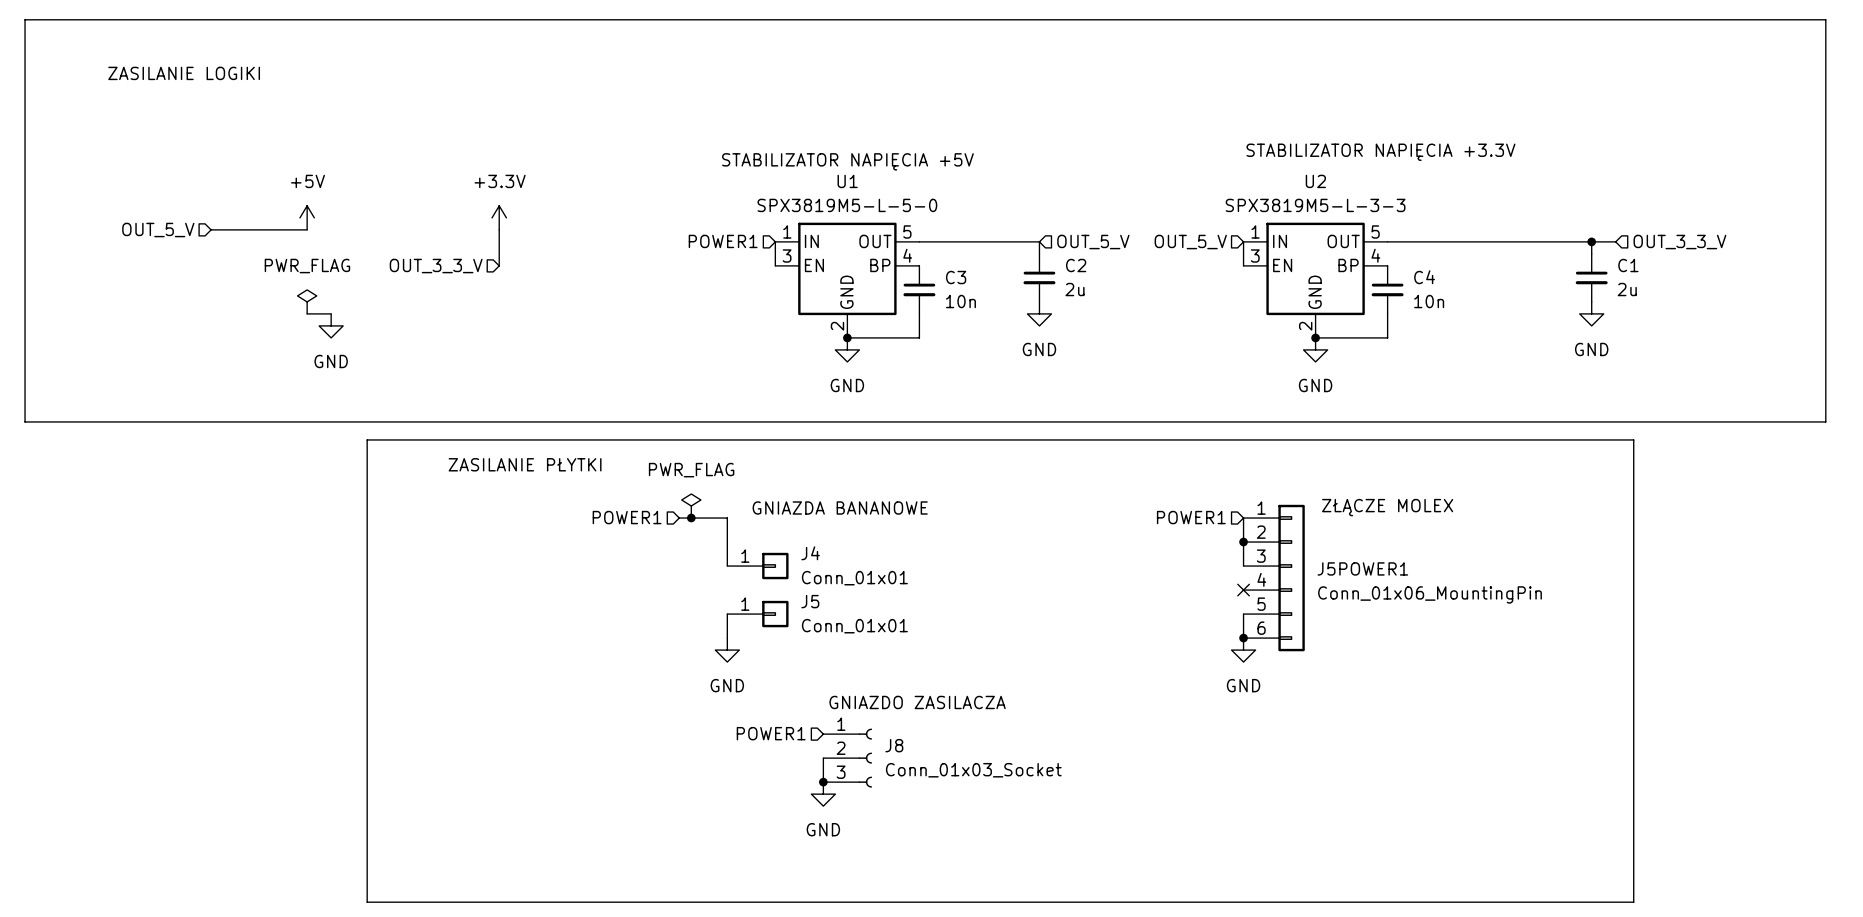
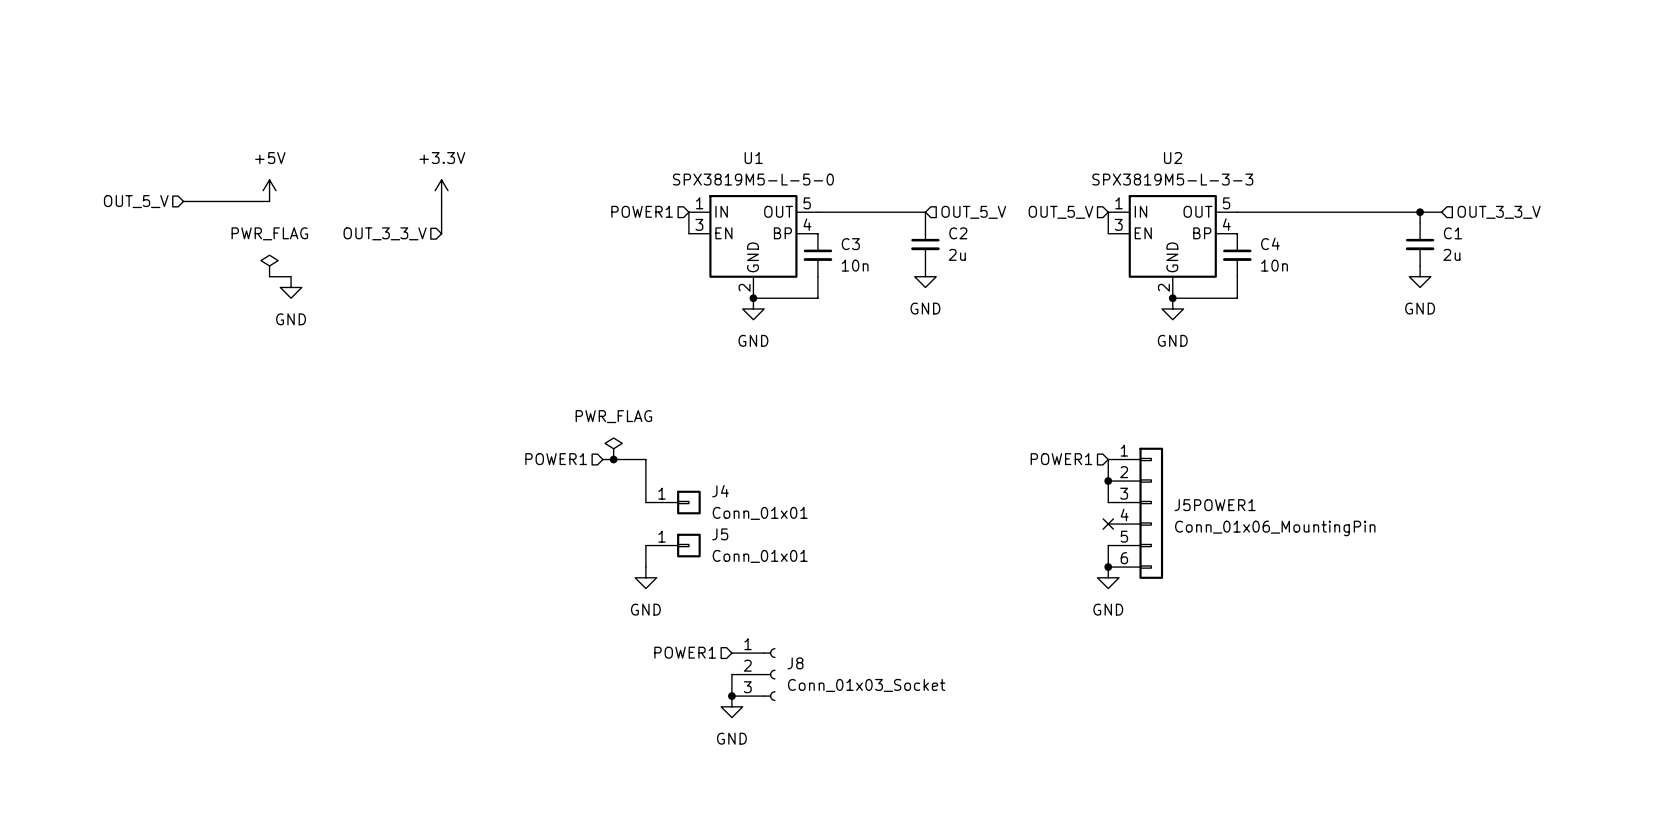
line: (25, 19) (1825, 19) (1825, 421) (25, 421) (25, 19) -> none
text: ZASILANIE LOGIKI (184, 73) -> none
text: STABILIZATOR NAPIĘCIA +3.3V (1380, 152) -> none
text: STABILIZATOR NAPIĘCIA +5V (847, 161) -> none
line: (367, 439) (1633, 439) (1633, 902) (367, 902) (367, 439) -> none
text: ZASILANIE PŁYTKI (525, 464) -> none
text: ZŁĄCZE MOLEX (1387, 507) -> none
text: GNIAZDA BANANOWE (840, 508) -> none
text: GNIAZDO ZASILACZA (917, 702) -> none

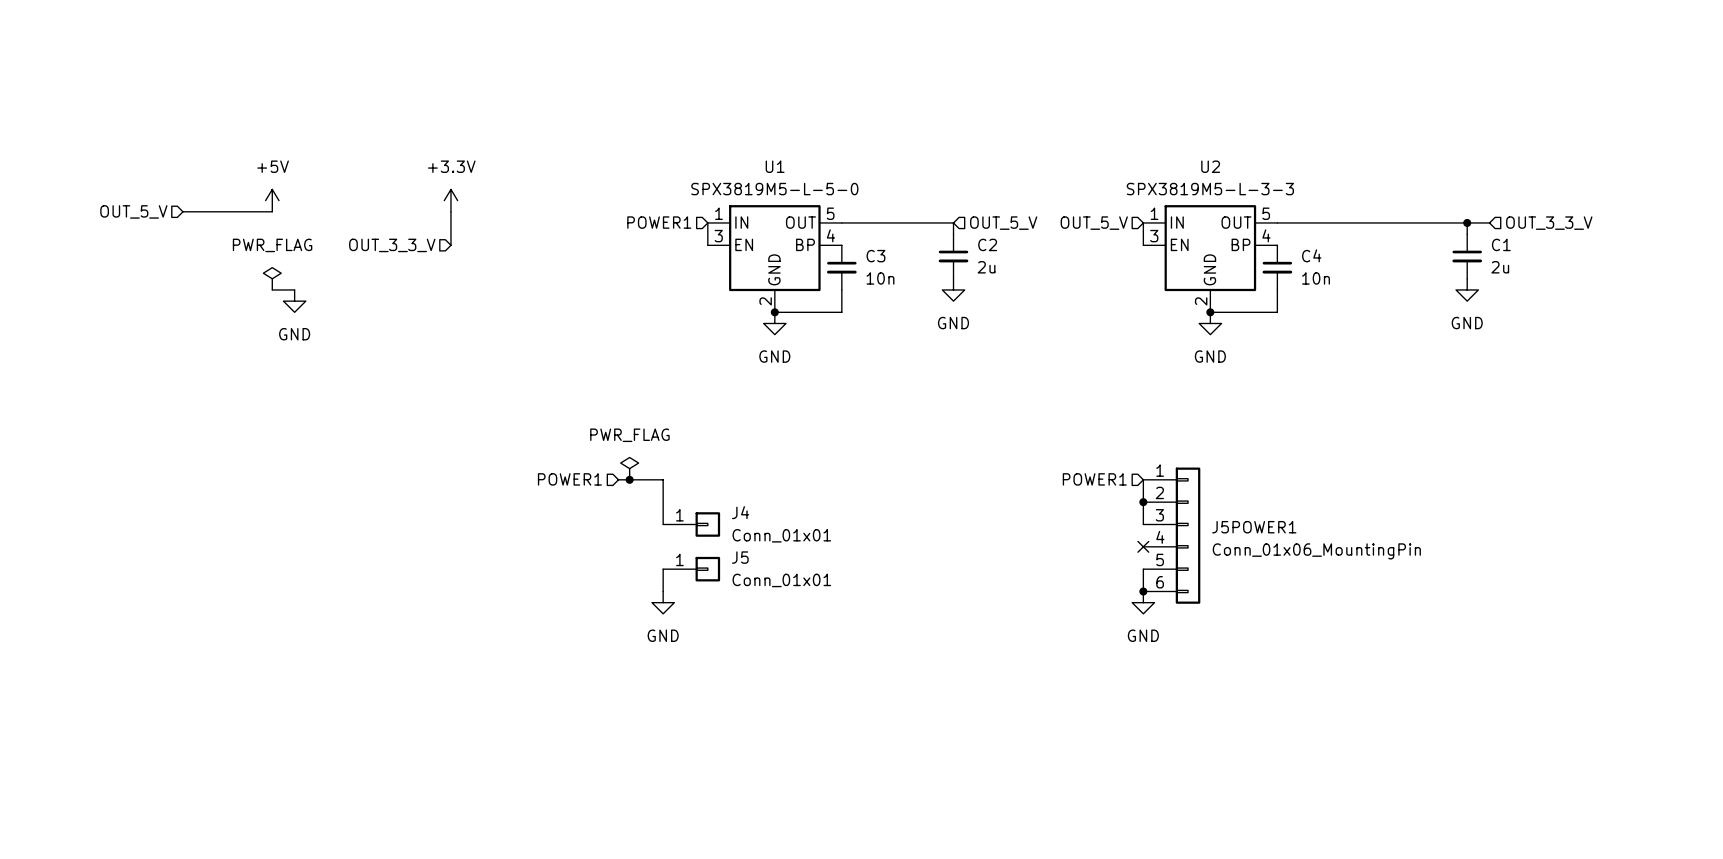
hierarchical label: POWER1 (685, 652) -> none
wire: (731, 674) (731, 696) -> none
J8: Conn_01x03_Socket (753, 674) -> none
junction: (731, 696) -> none
power symbol: GND (731, 706) -> none

